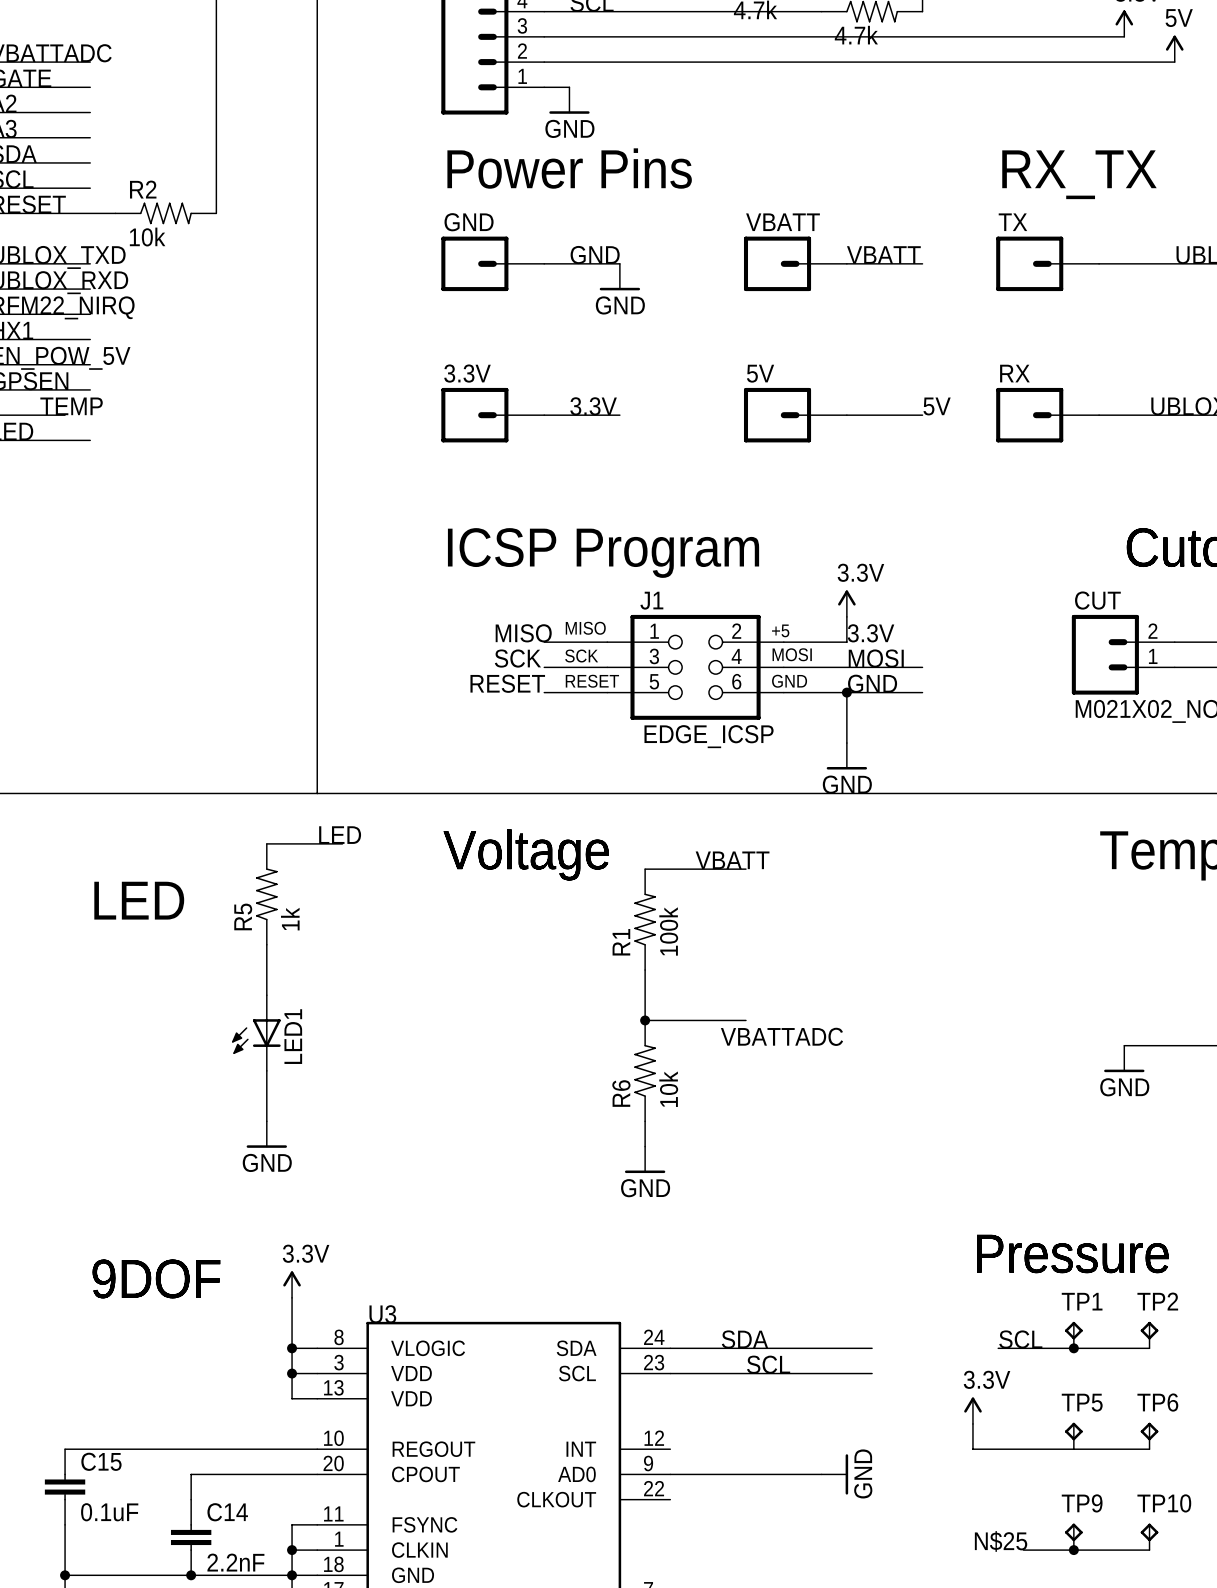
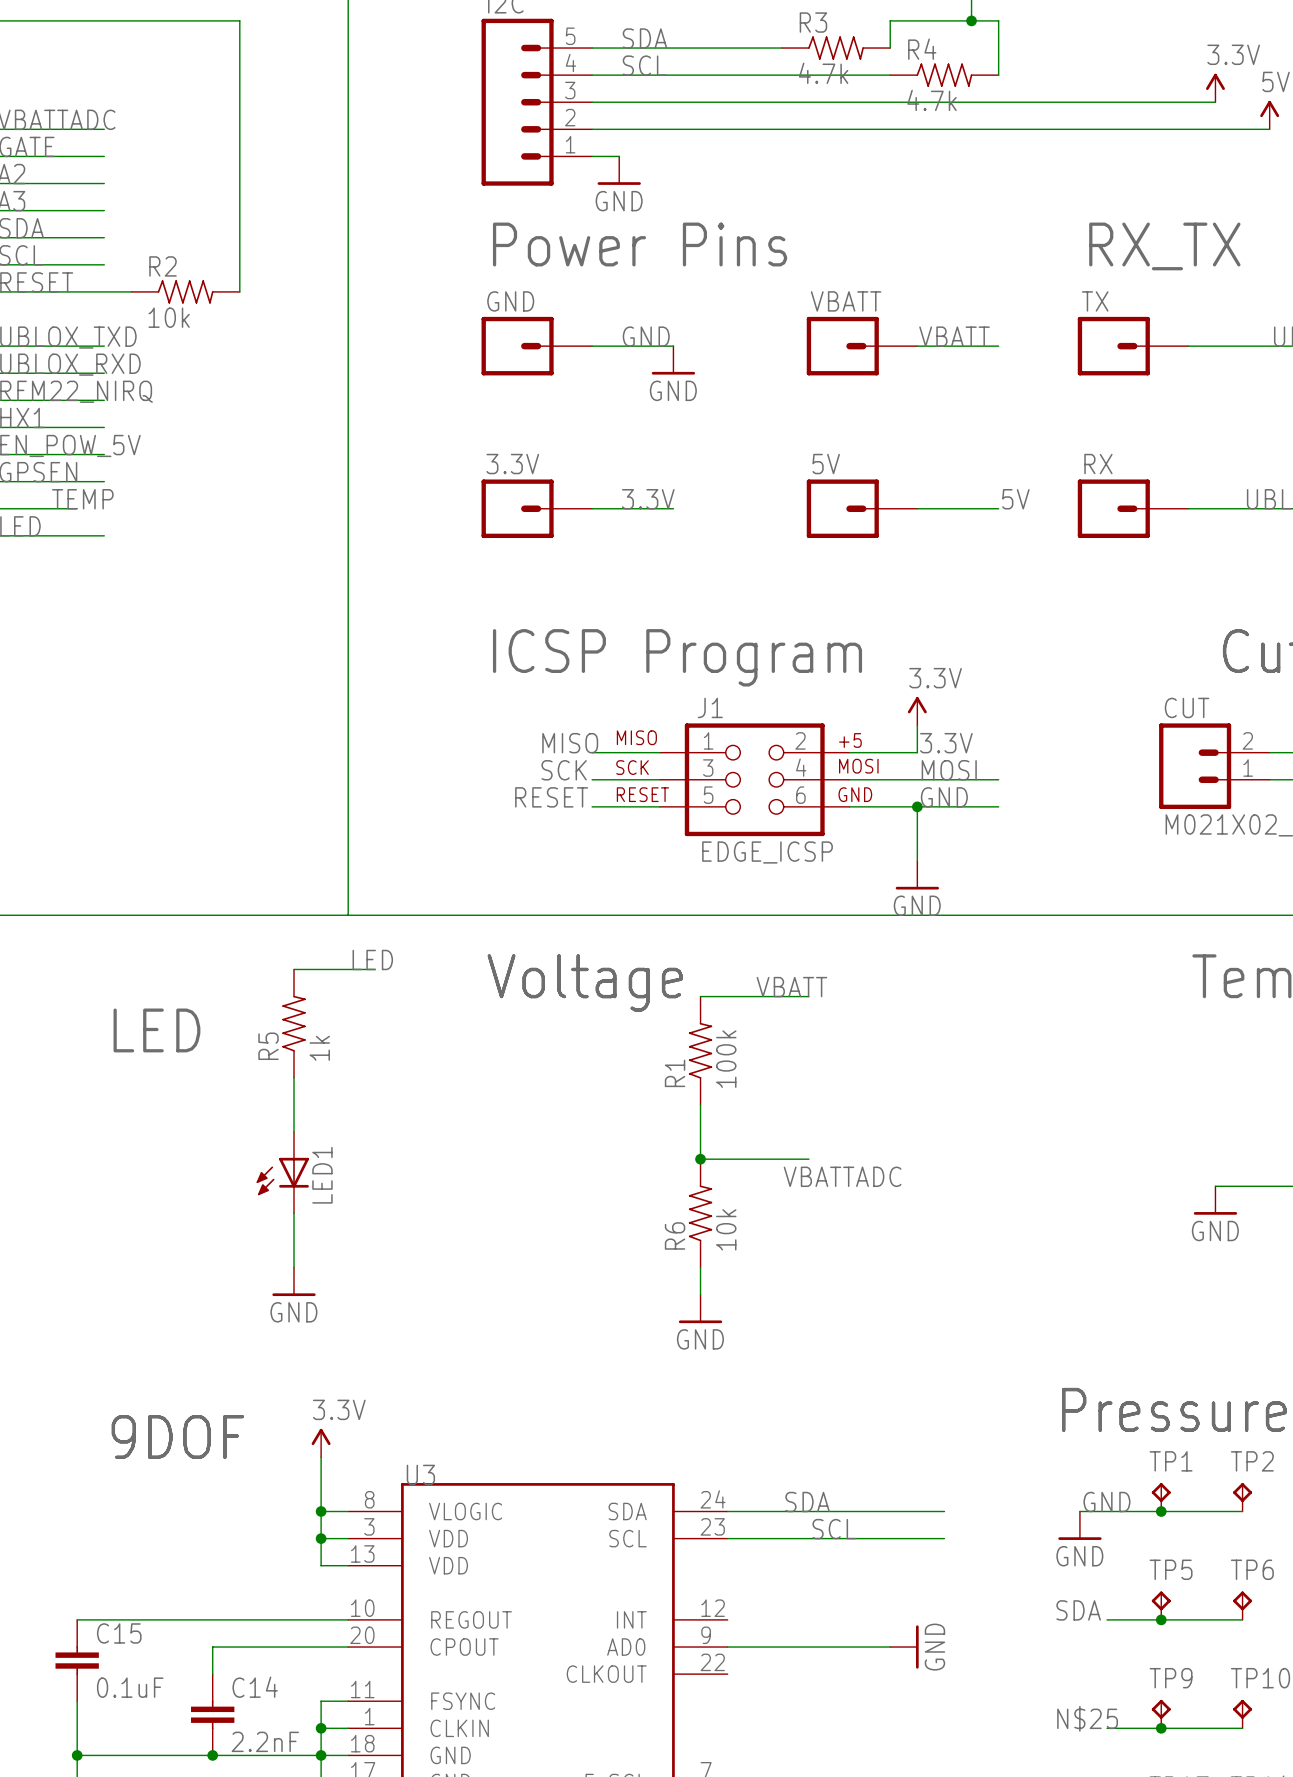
label: SCL (1020, 1339) -> GND (1106, 1502)
power symbol: none -> GND (1079, 1525)
power symbol: 3.3V (972, 1410) -> none
wire: (972, 1423) (972, 1449) (1023, 1449) -> none
label: none -> SDA (1078, 1610)
junction: none -> (1161, 1619)

